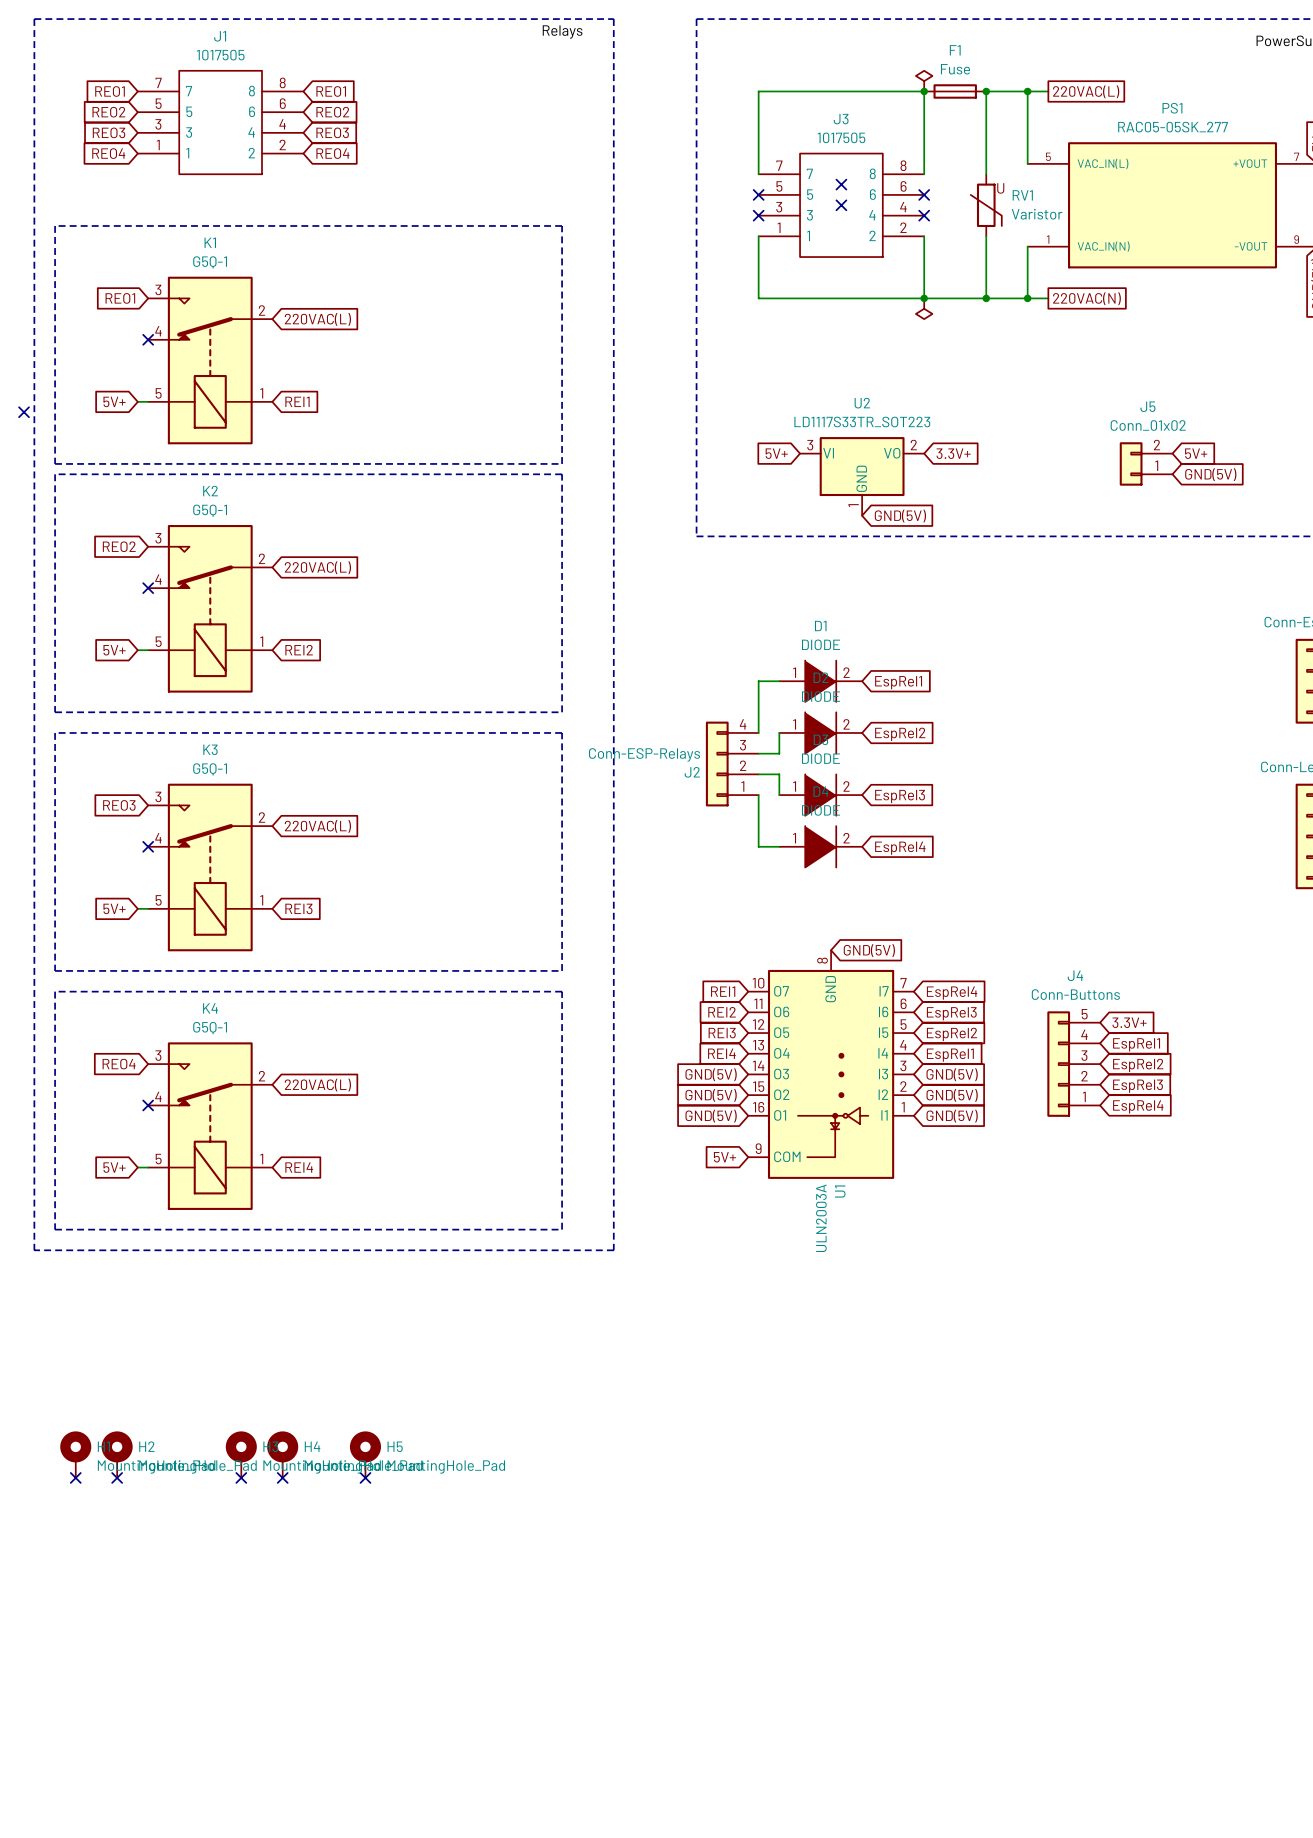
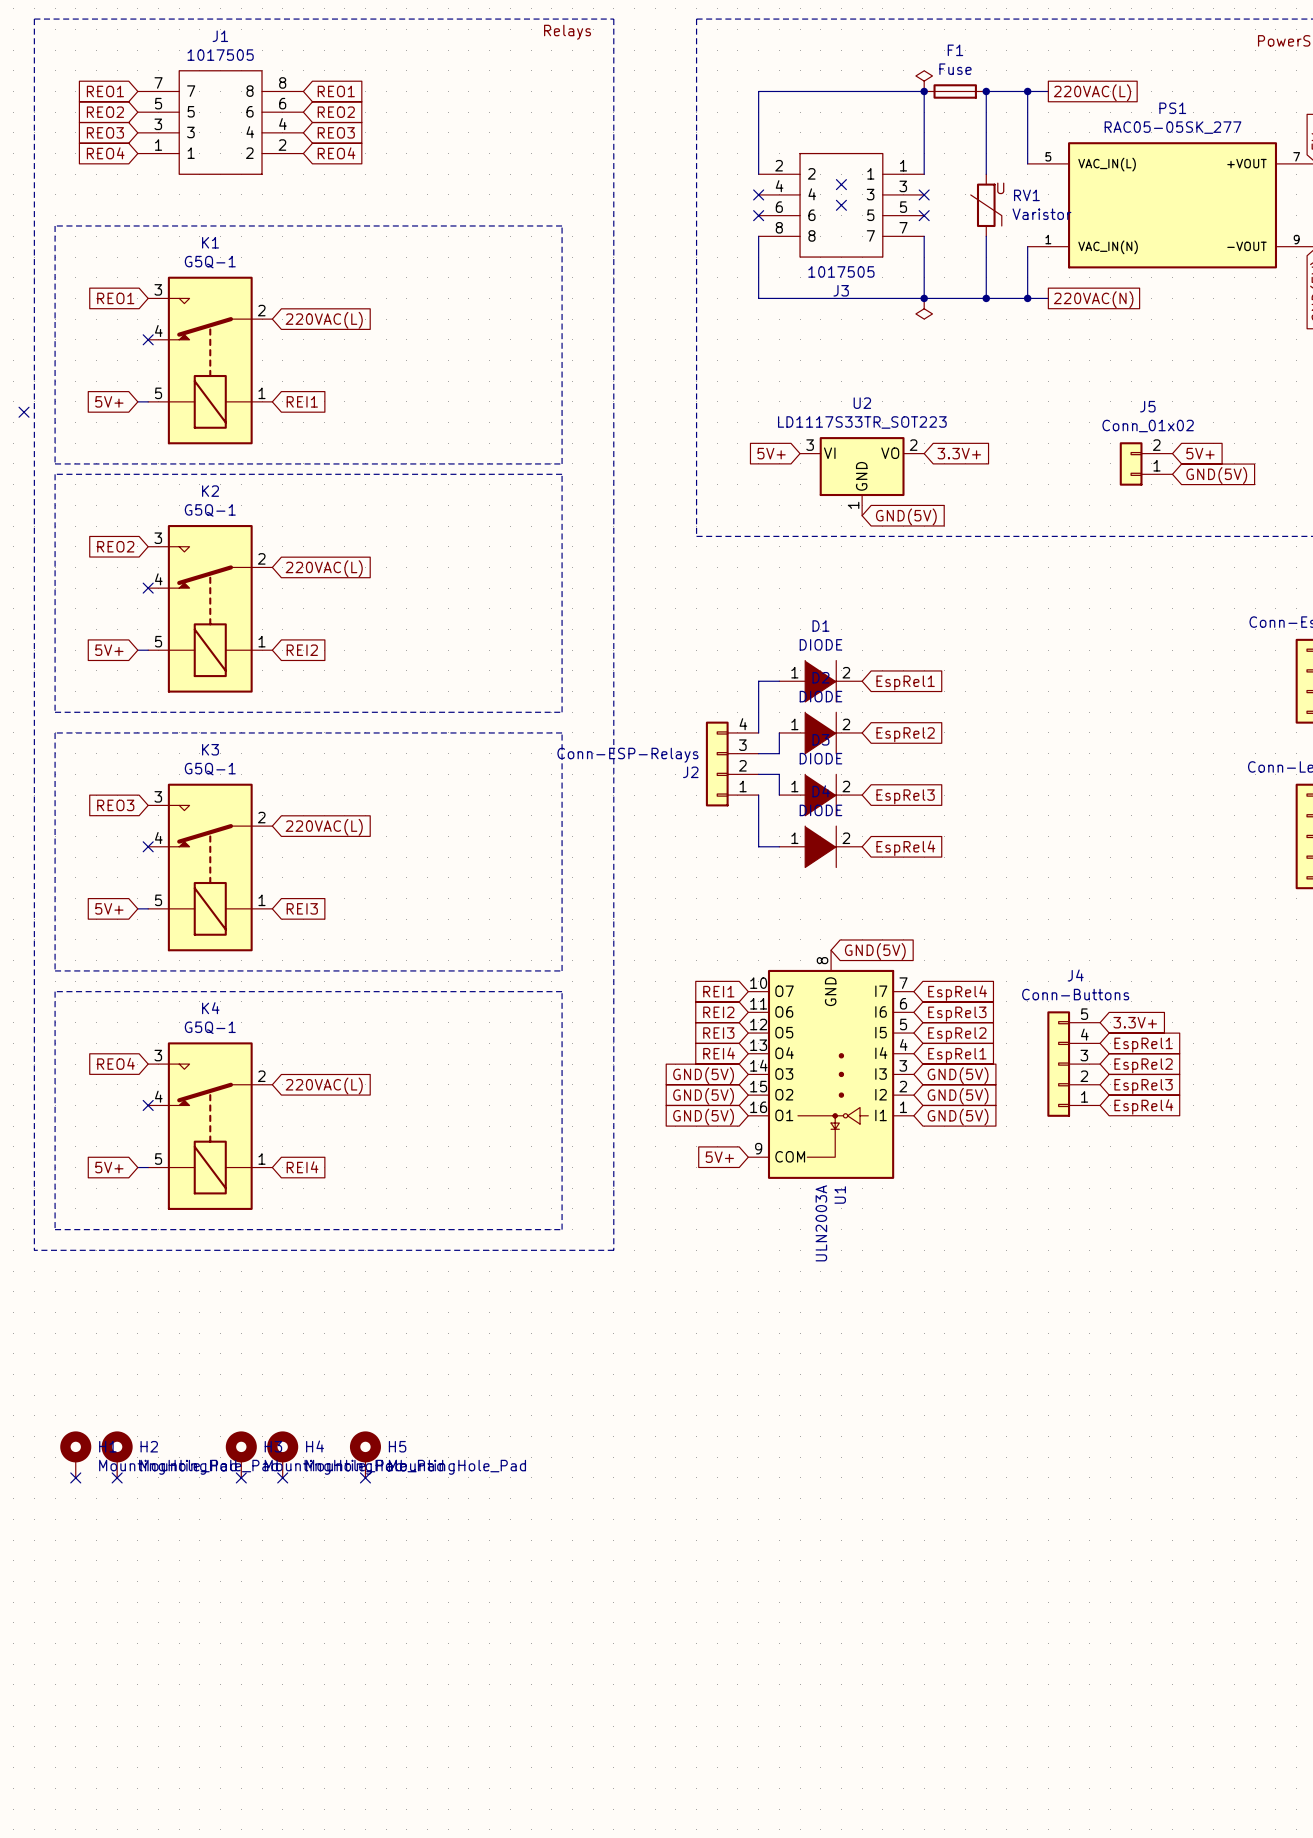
J3 rotation: 0° (841, 205) -> 180° (841, 205)

